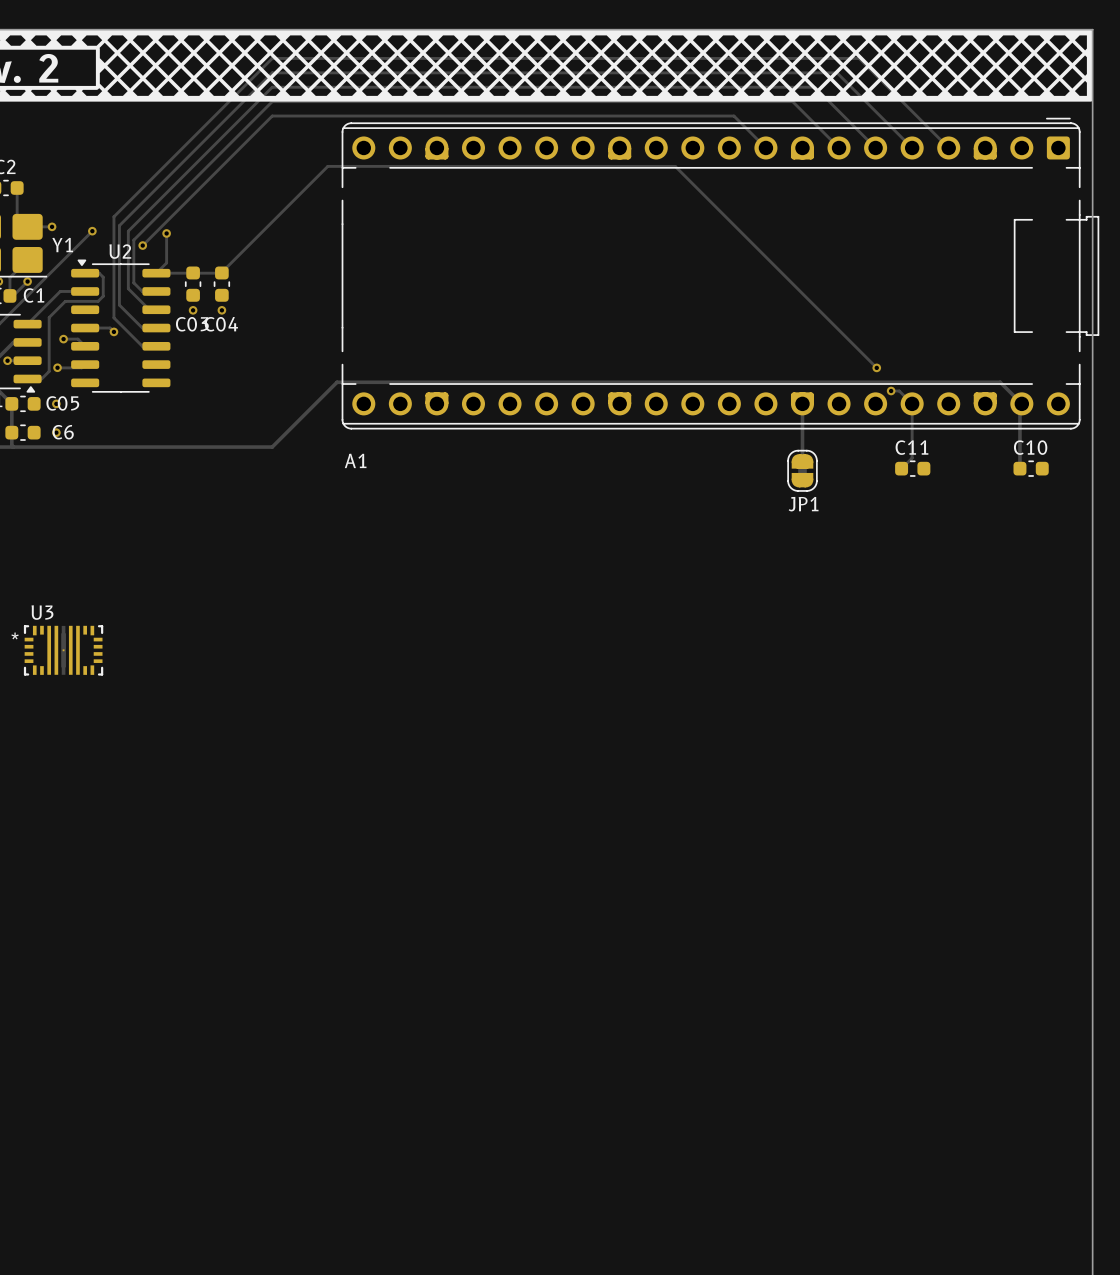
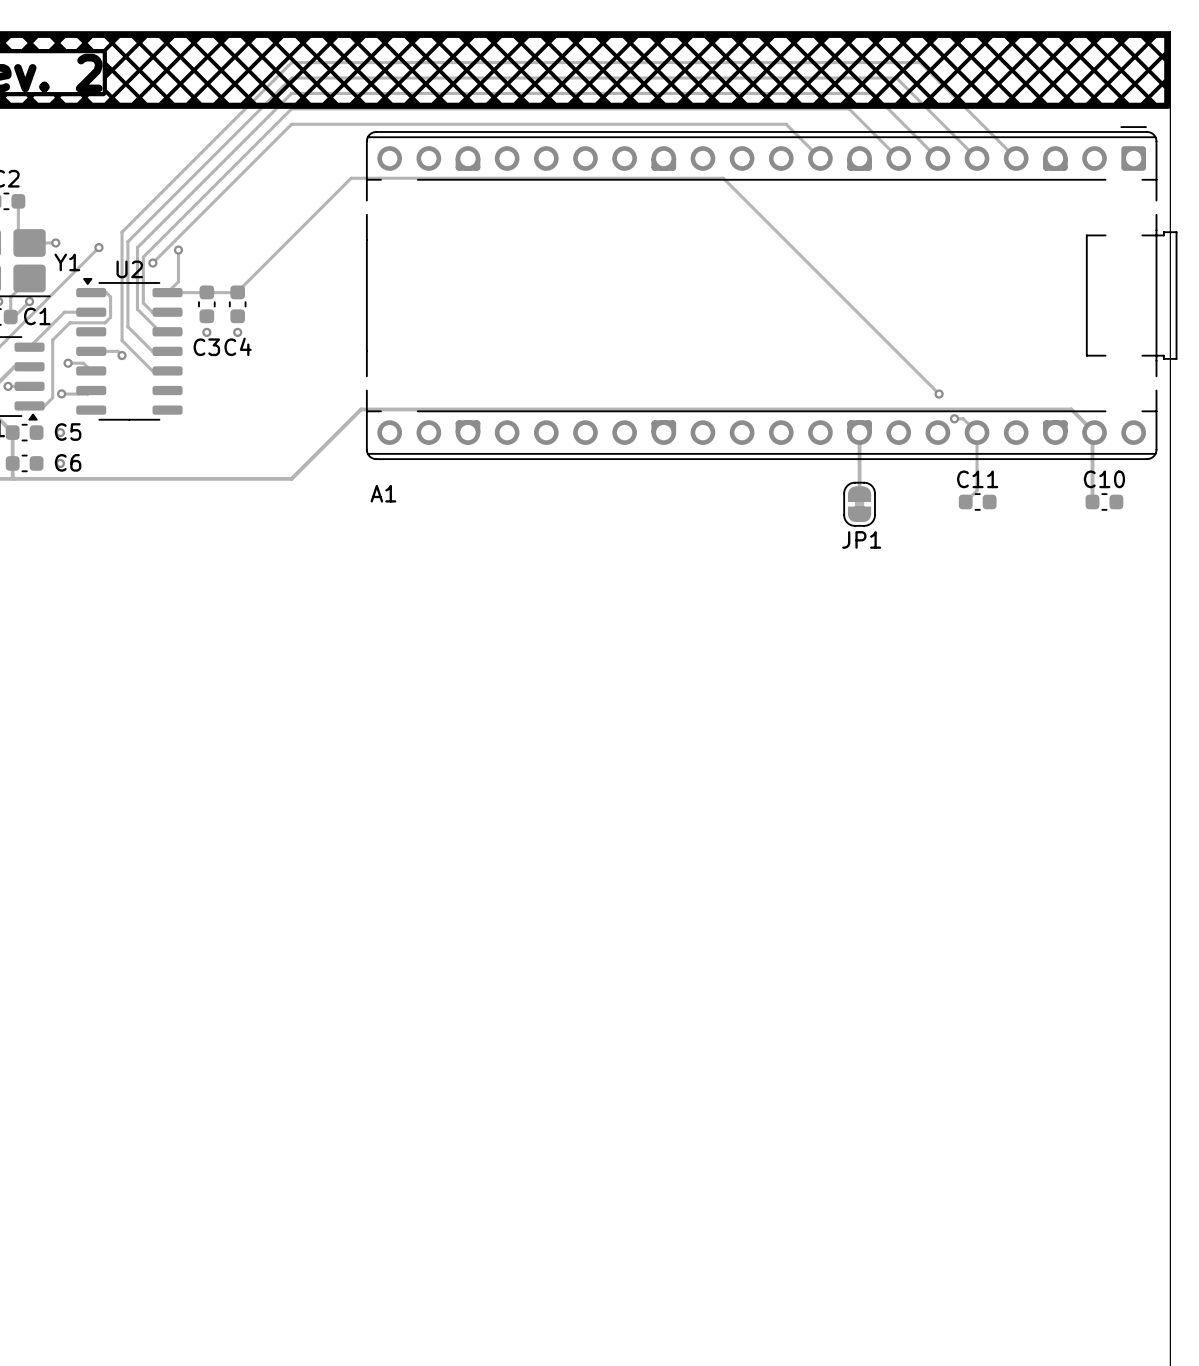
C03 name: C03 (192, 324) -> C3 (206, 347)
C04 name: C04 (221, 324) -> C4 (238, 346)
C05 name: C05 (62, 403) -> C5 (68, 432)
U3: (63, 650) -> none

